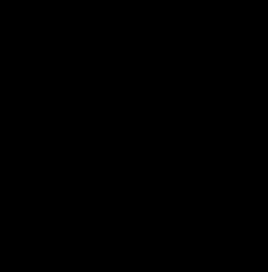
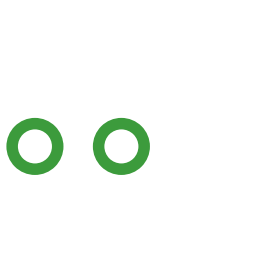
part: none -> (78, 146)

